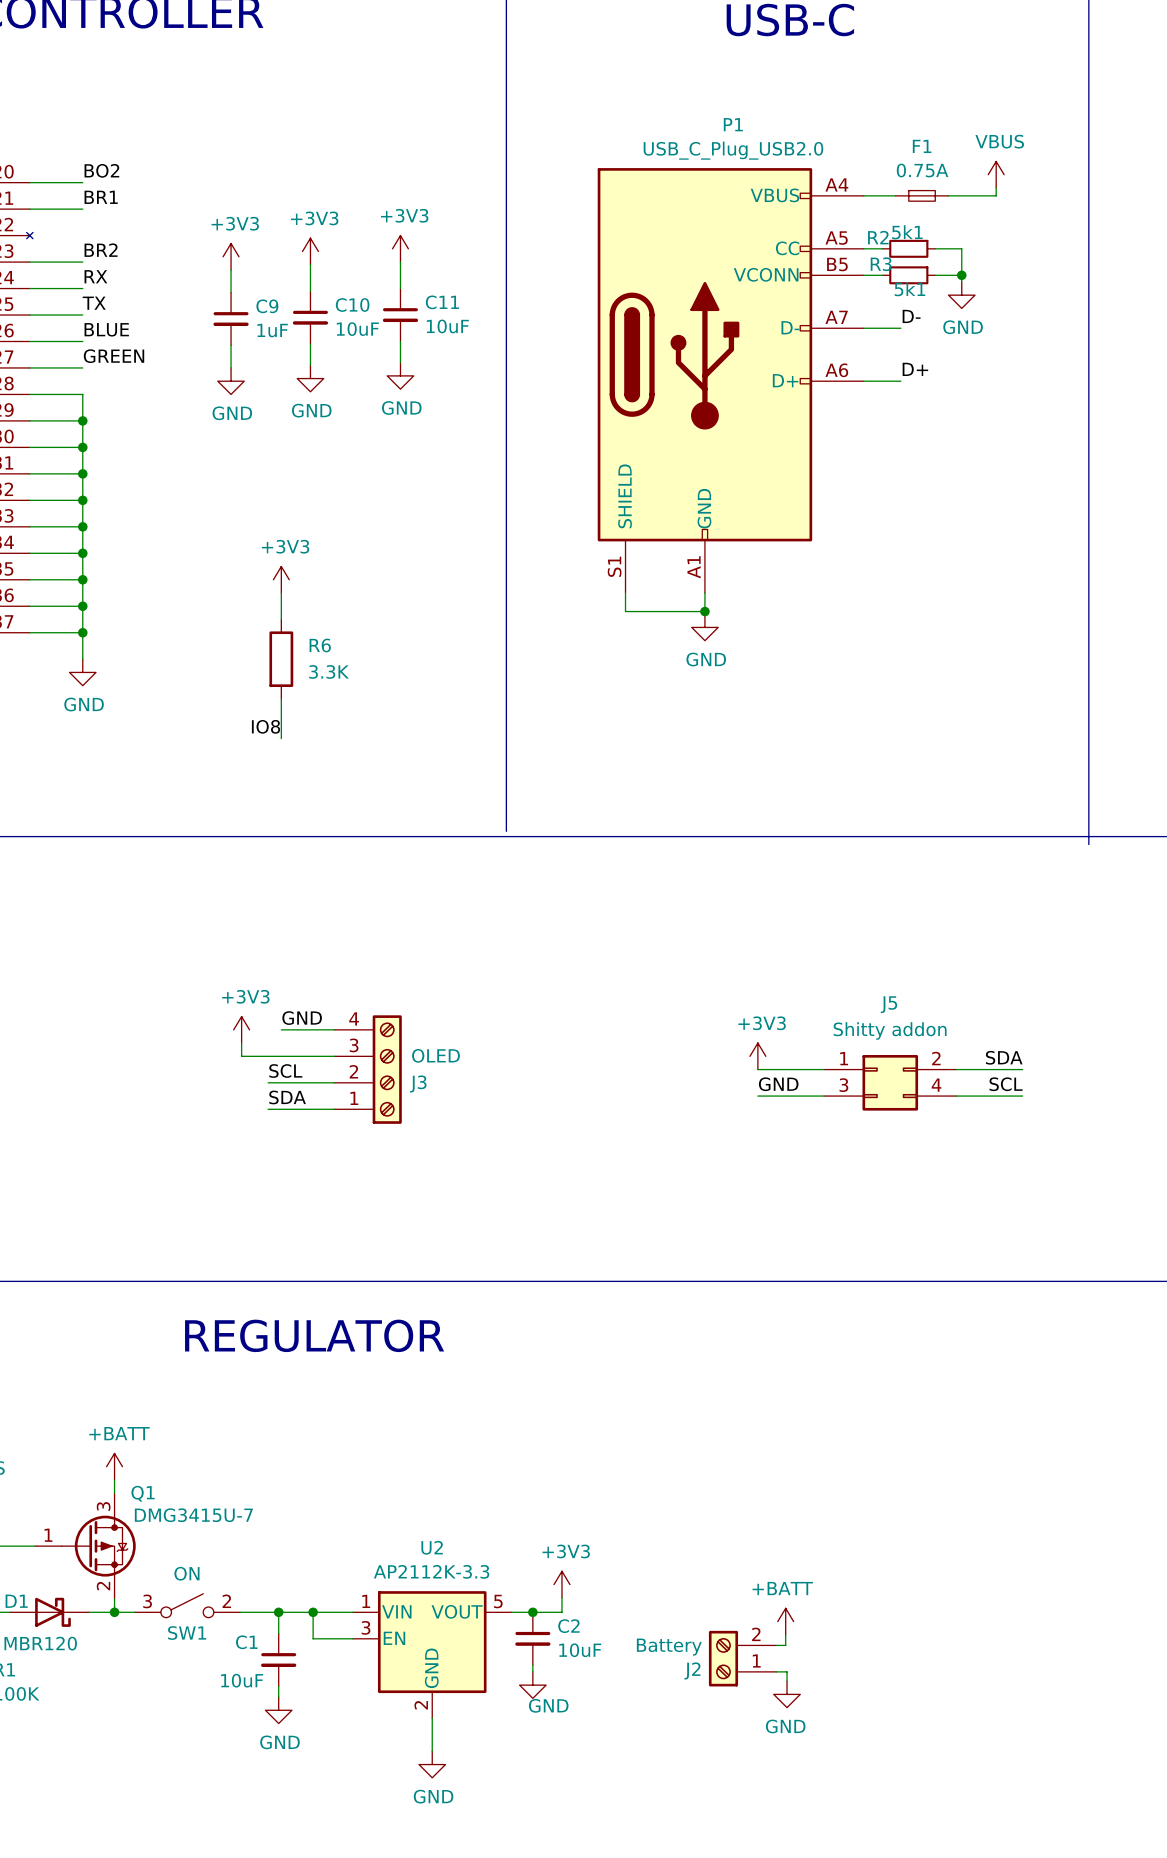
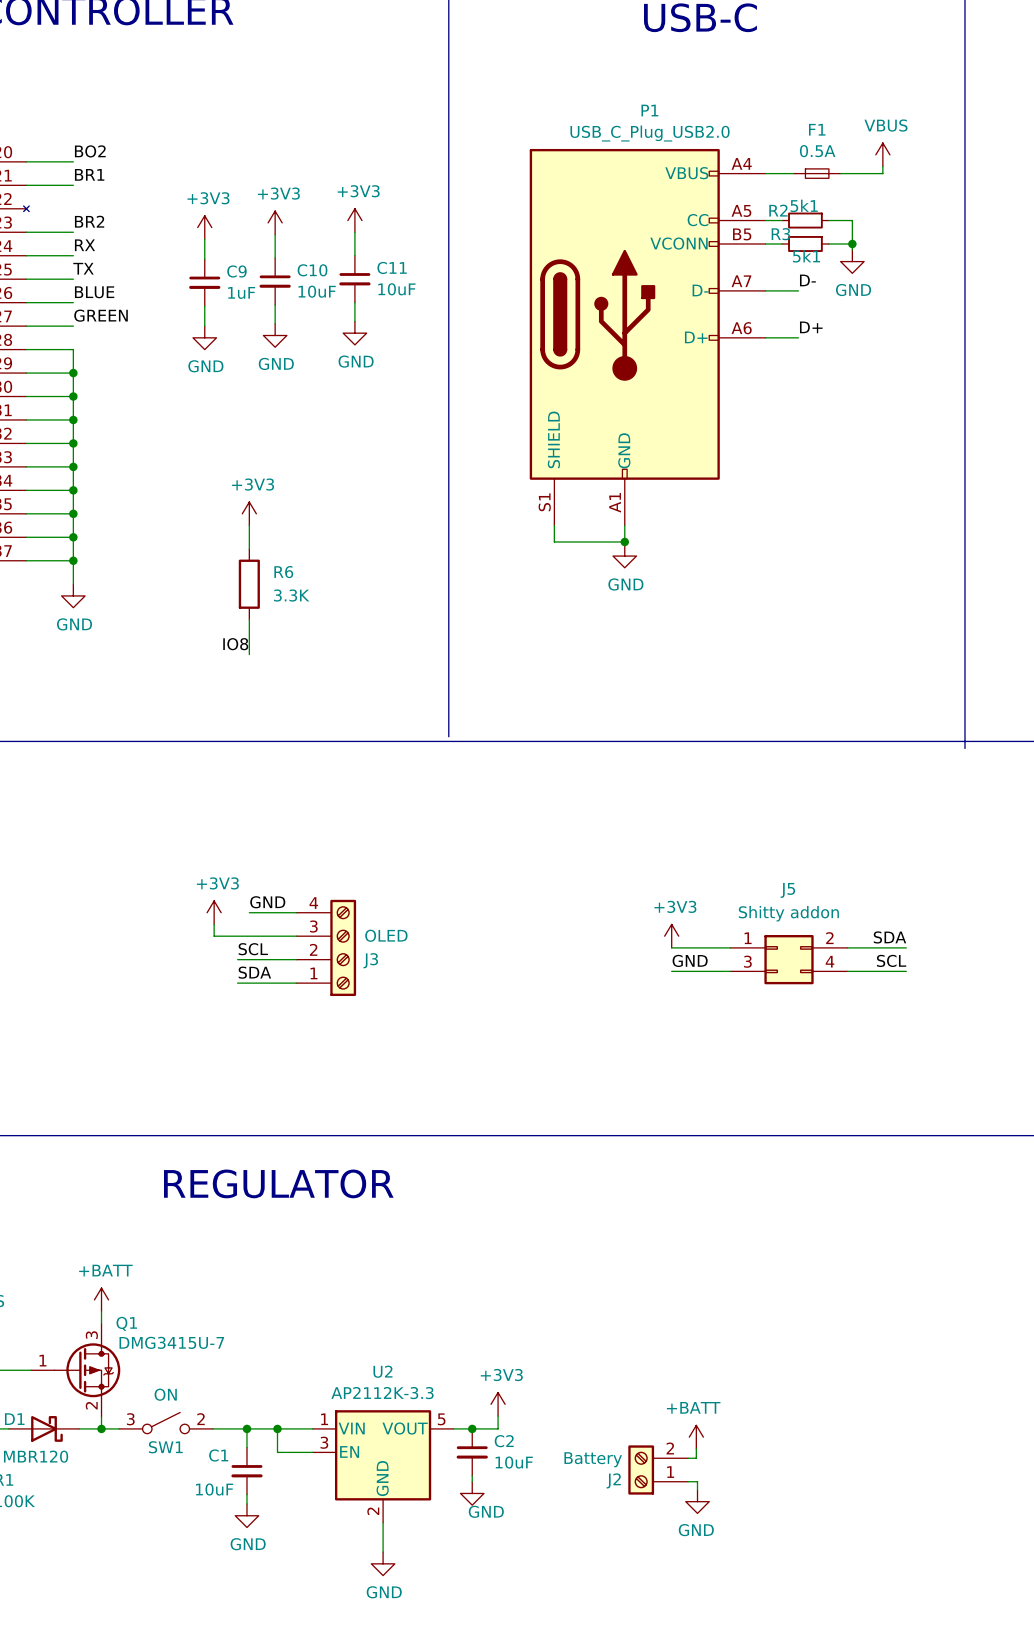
F1 value: 0.75A (922, 170) -> 0.5A (817, 151)

